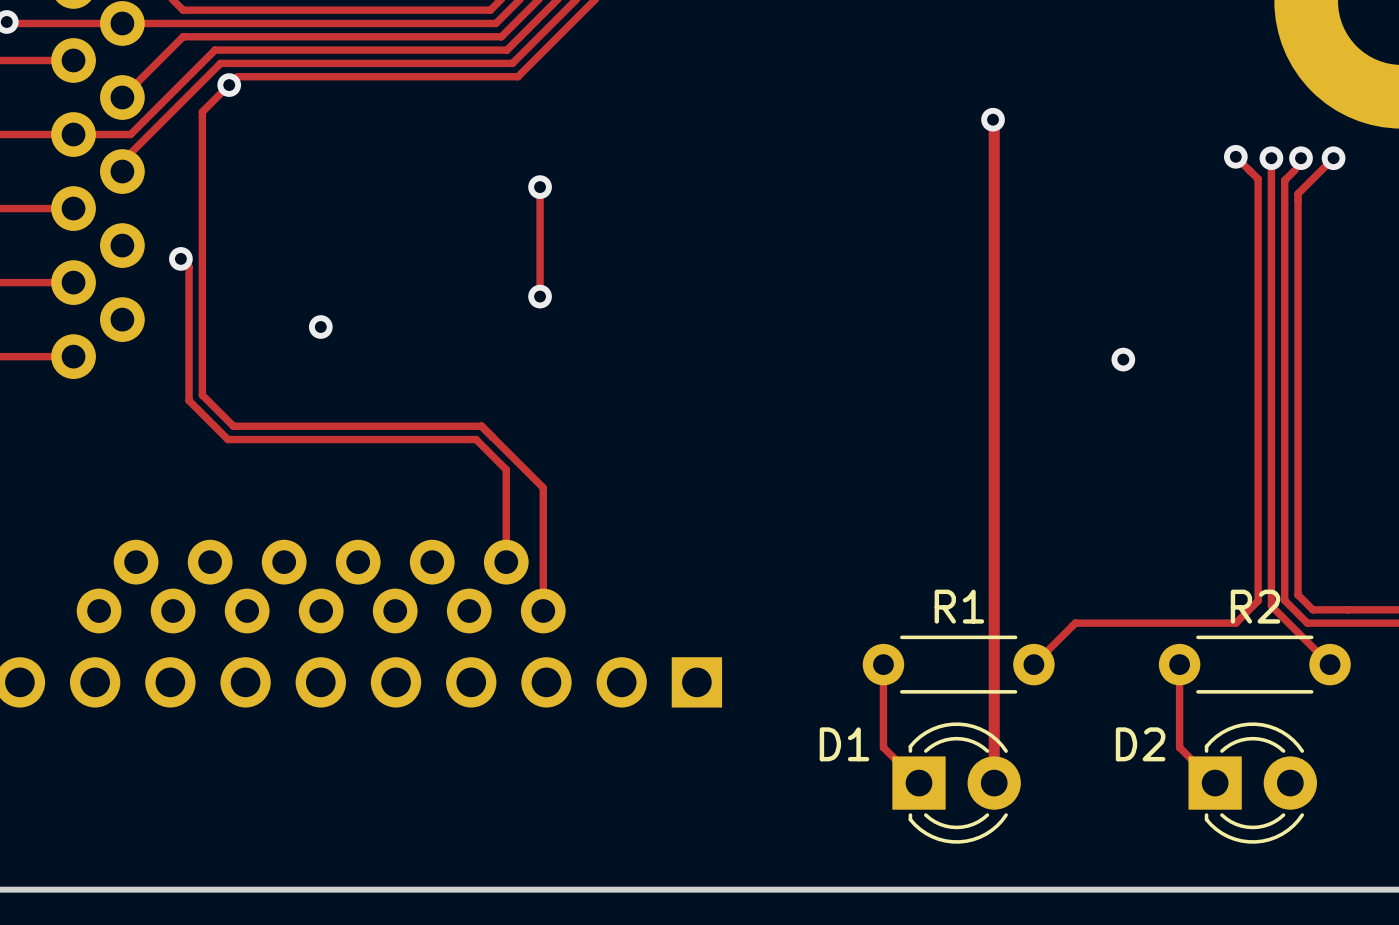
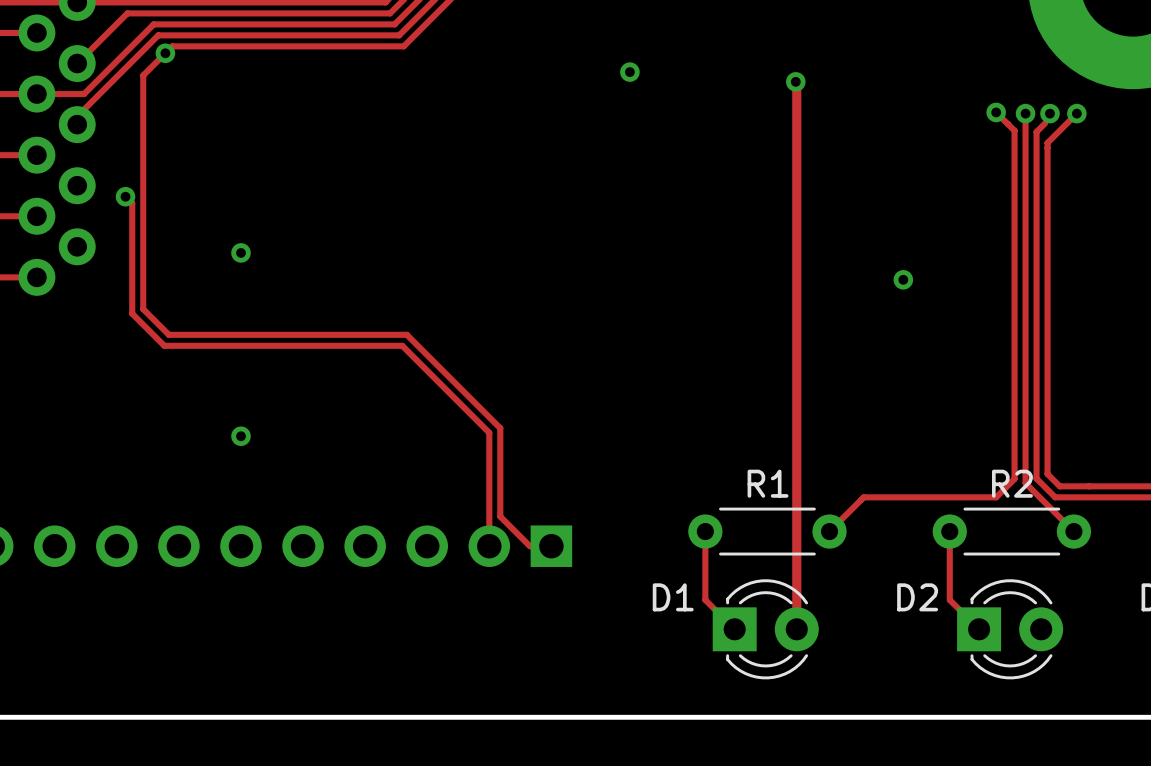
via: none -> (629, 72)
track: (540, 187) (540, 296) -> none
via: (540, 187) -> none
via: (540, 296) -> none
track: (481, 426) (543, 487) (543, 611) -> (373, 334) (406, 334) (500, 428) (500, 516) (529, 546) (551, 546)
track: (476, 439) (506, 469) (506, 562) -> (369, 345) (402, 345) (489, 432) (489, 546)
via: none -> (241, 436)
part: (321, 586) -> none

